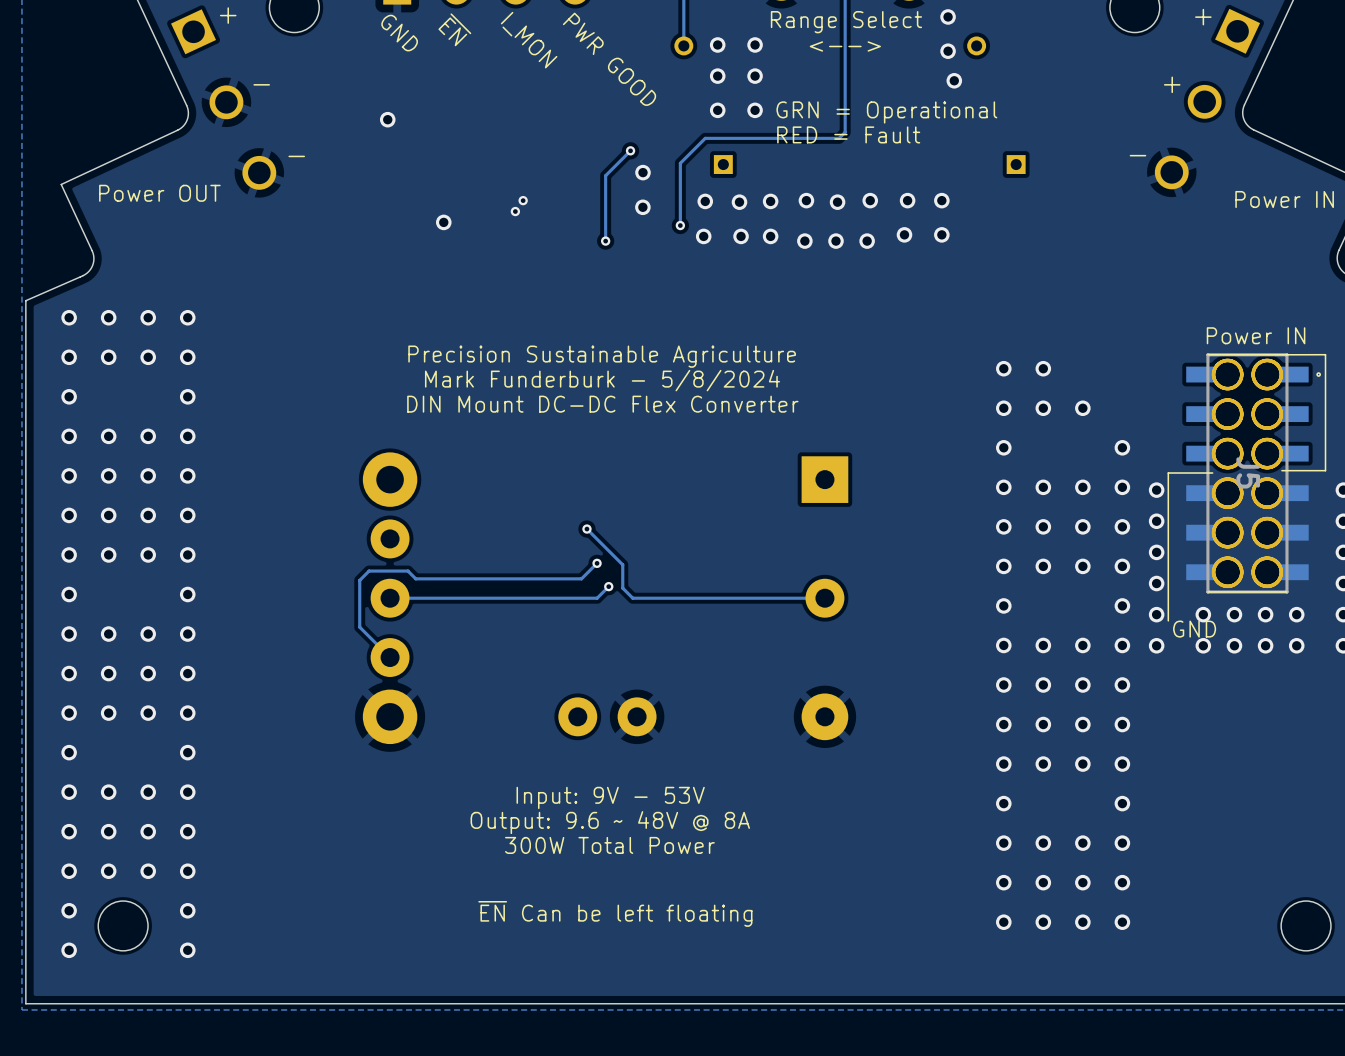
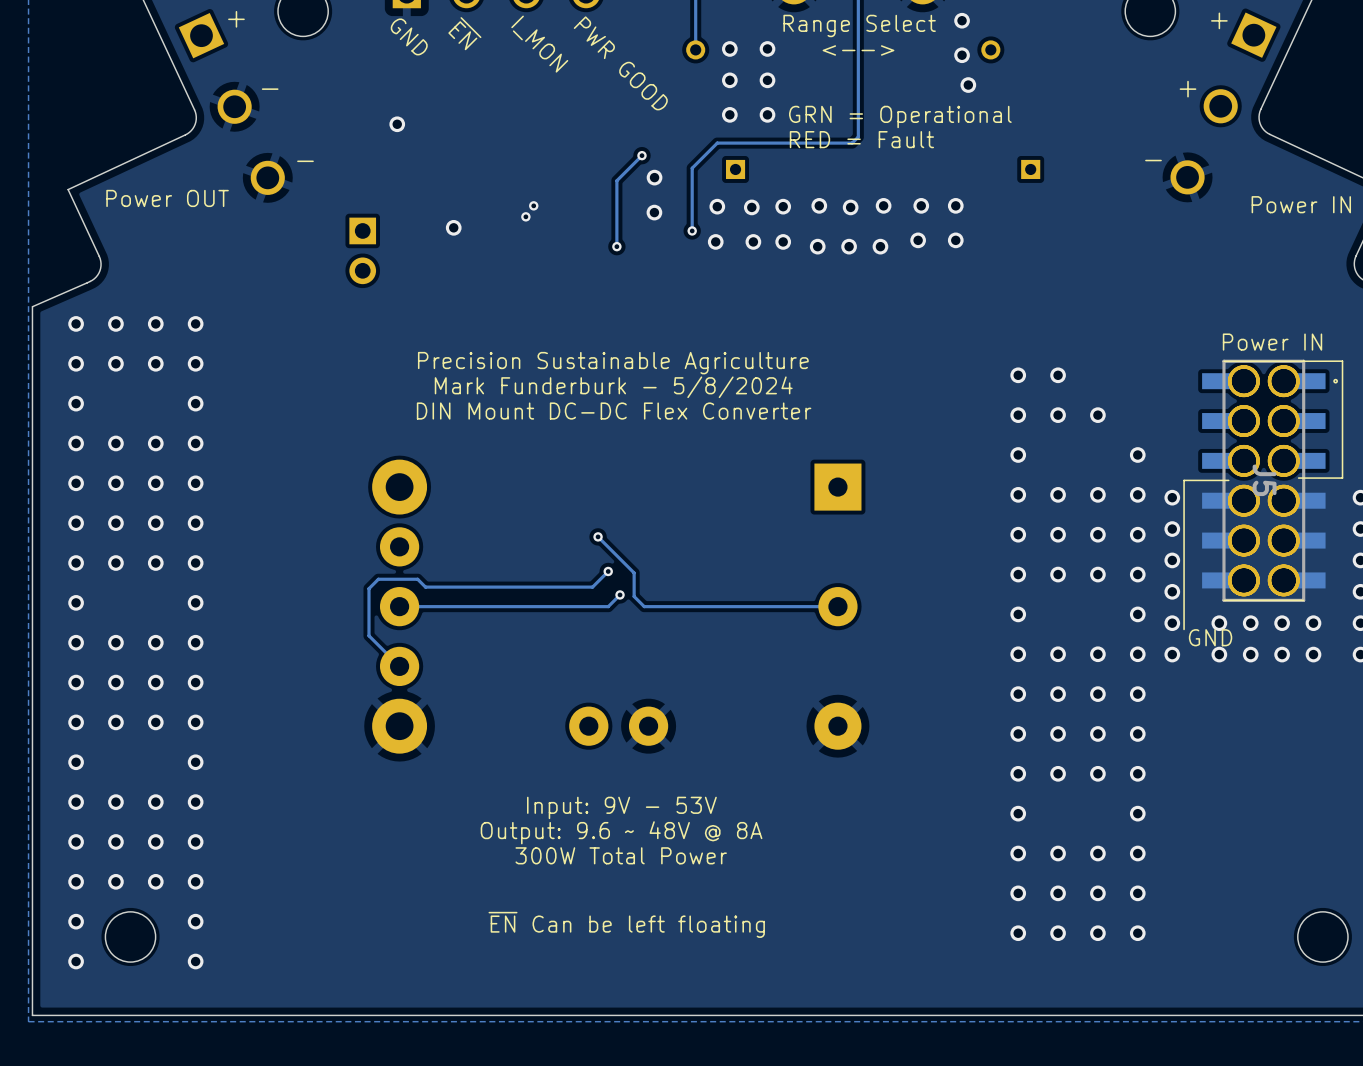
part: none -> (362, 250)

